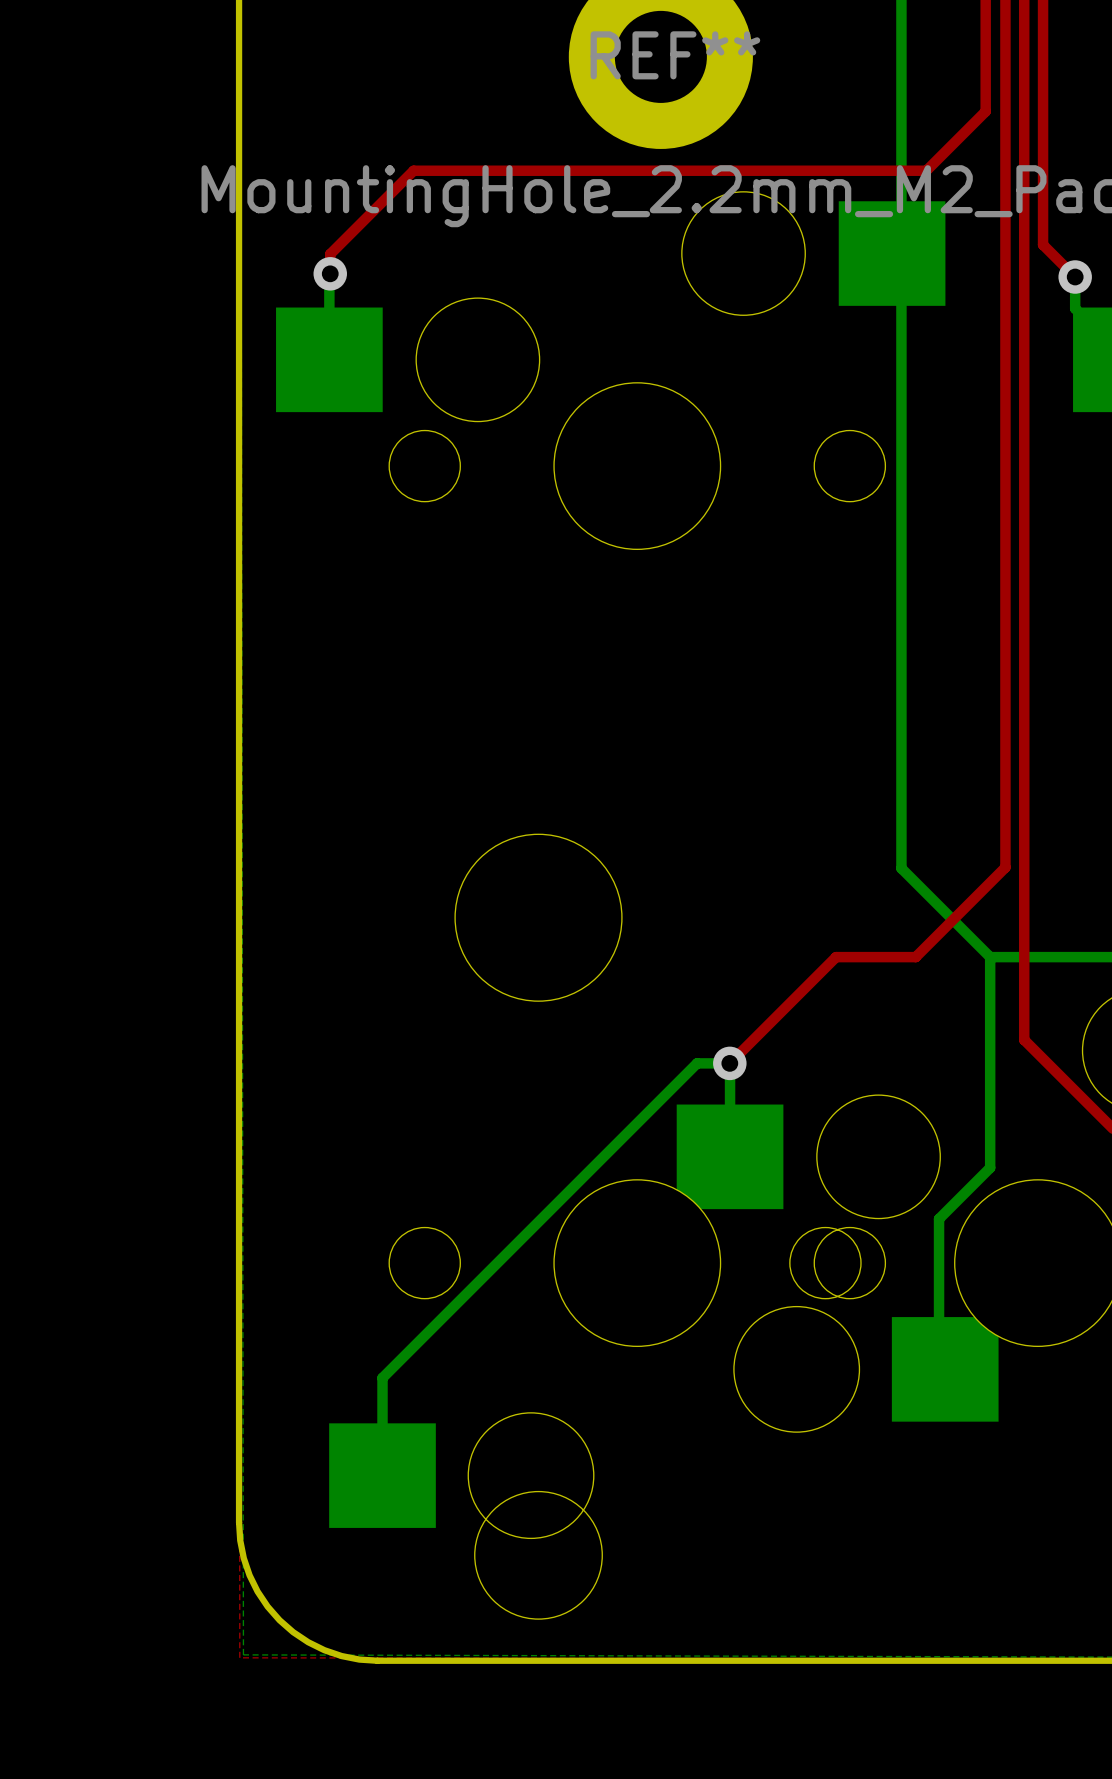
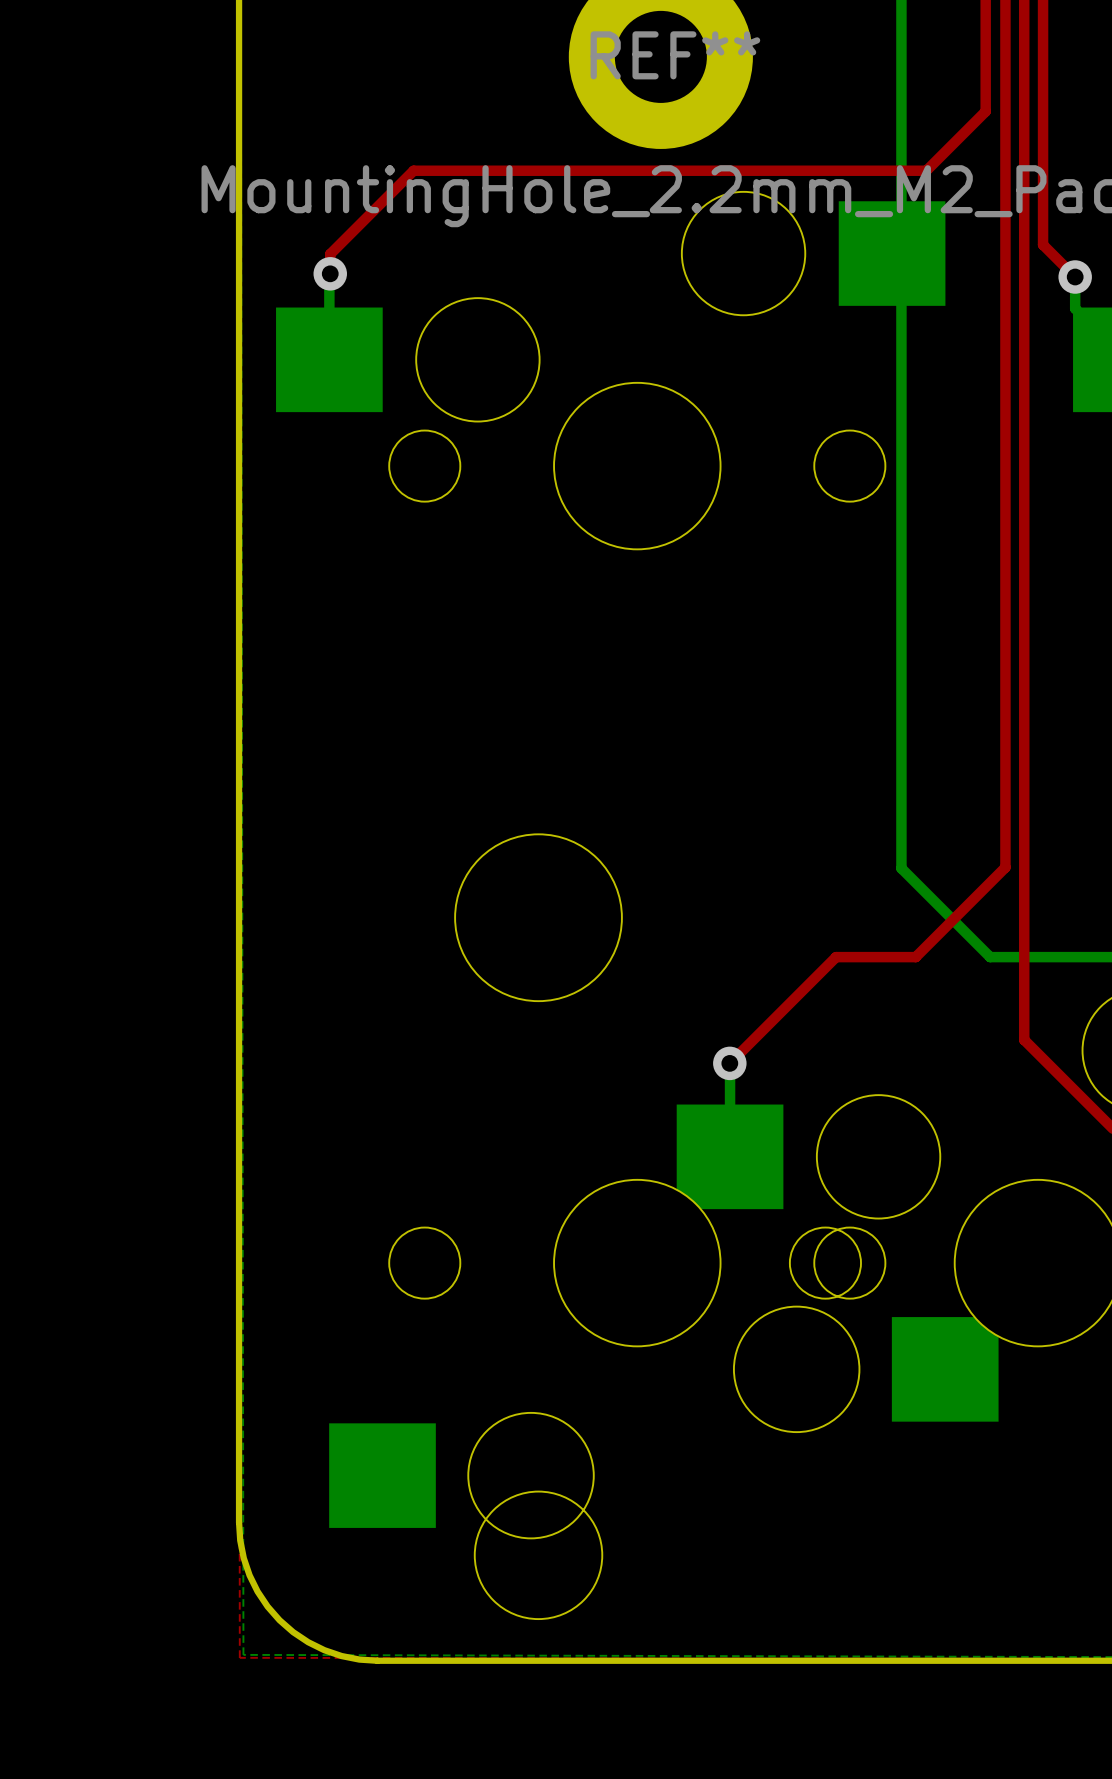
bottom track: (990, 957) (990, 1167) (939, 1218) (939, 1363) (945, 1369) -> none
bottom track: (729, 1063) (697, 1063) (382, 1377) (382, 1475) -> none

